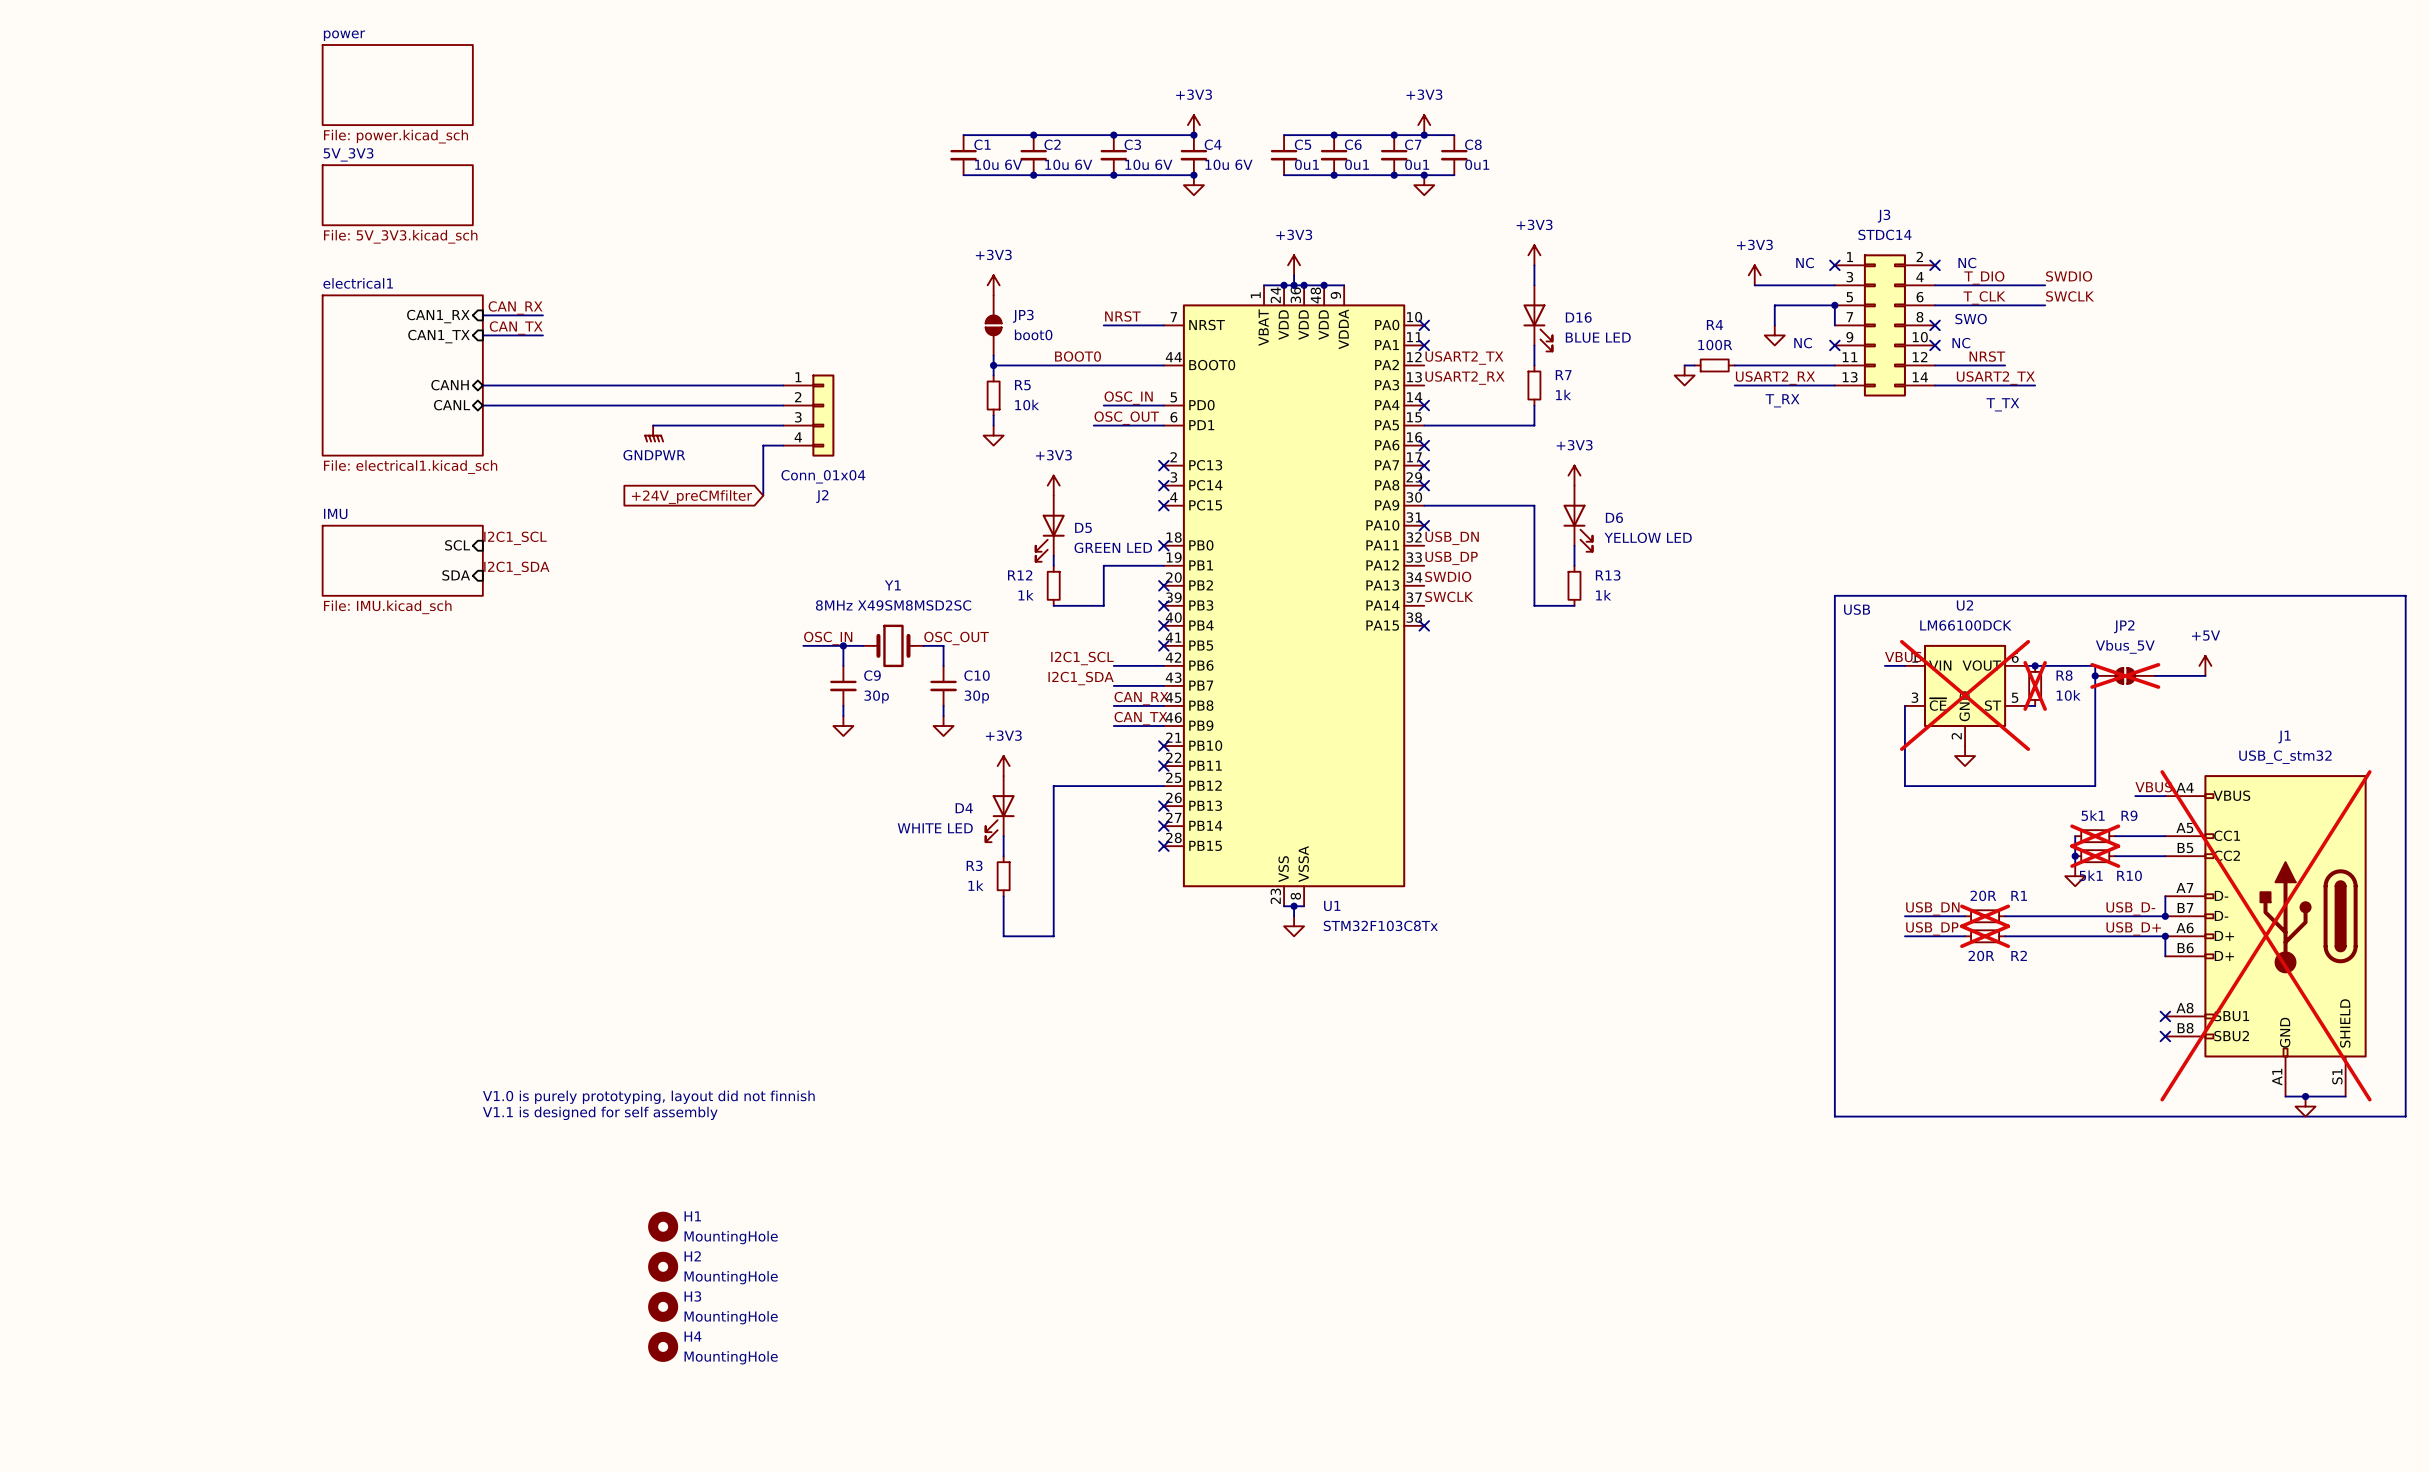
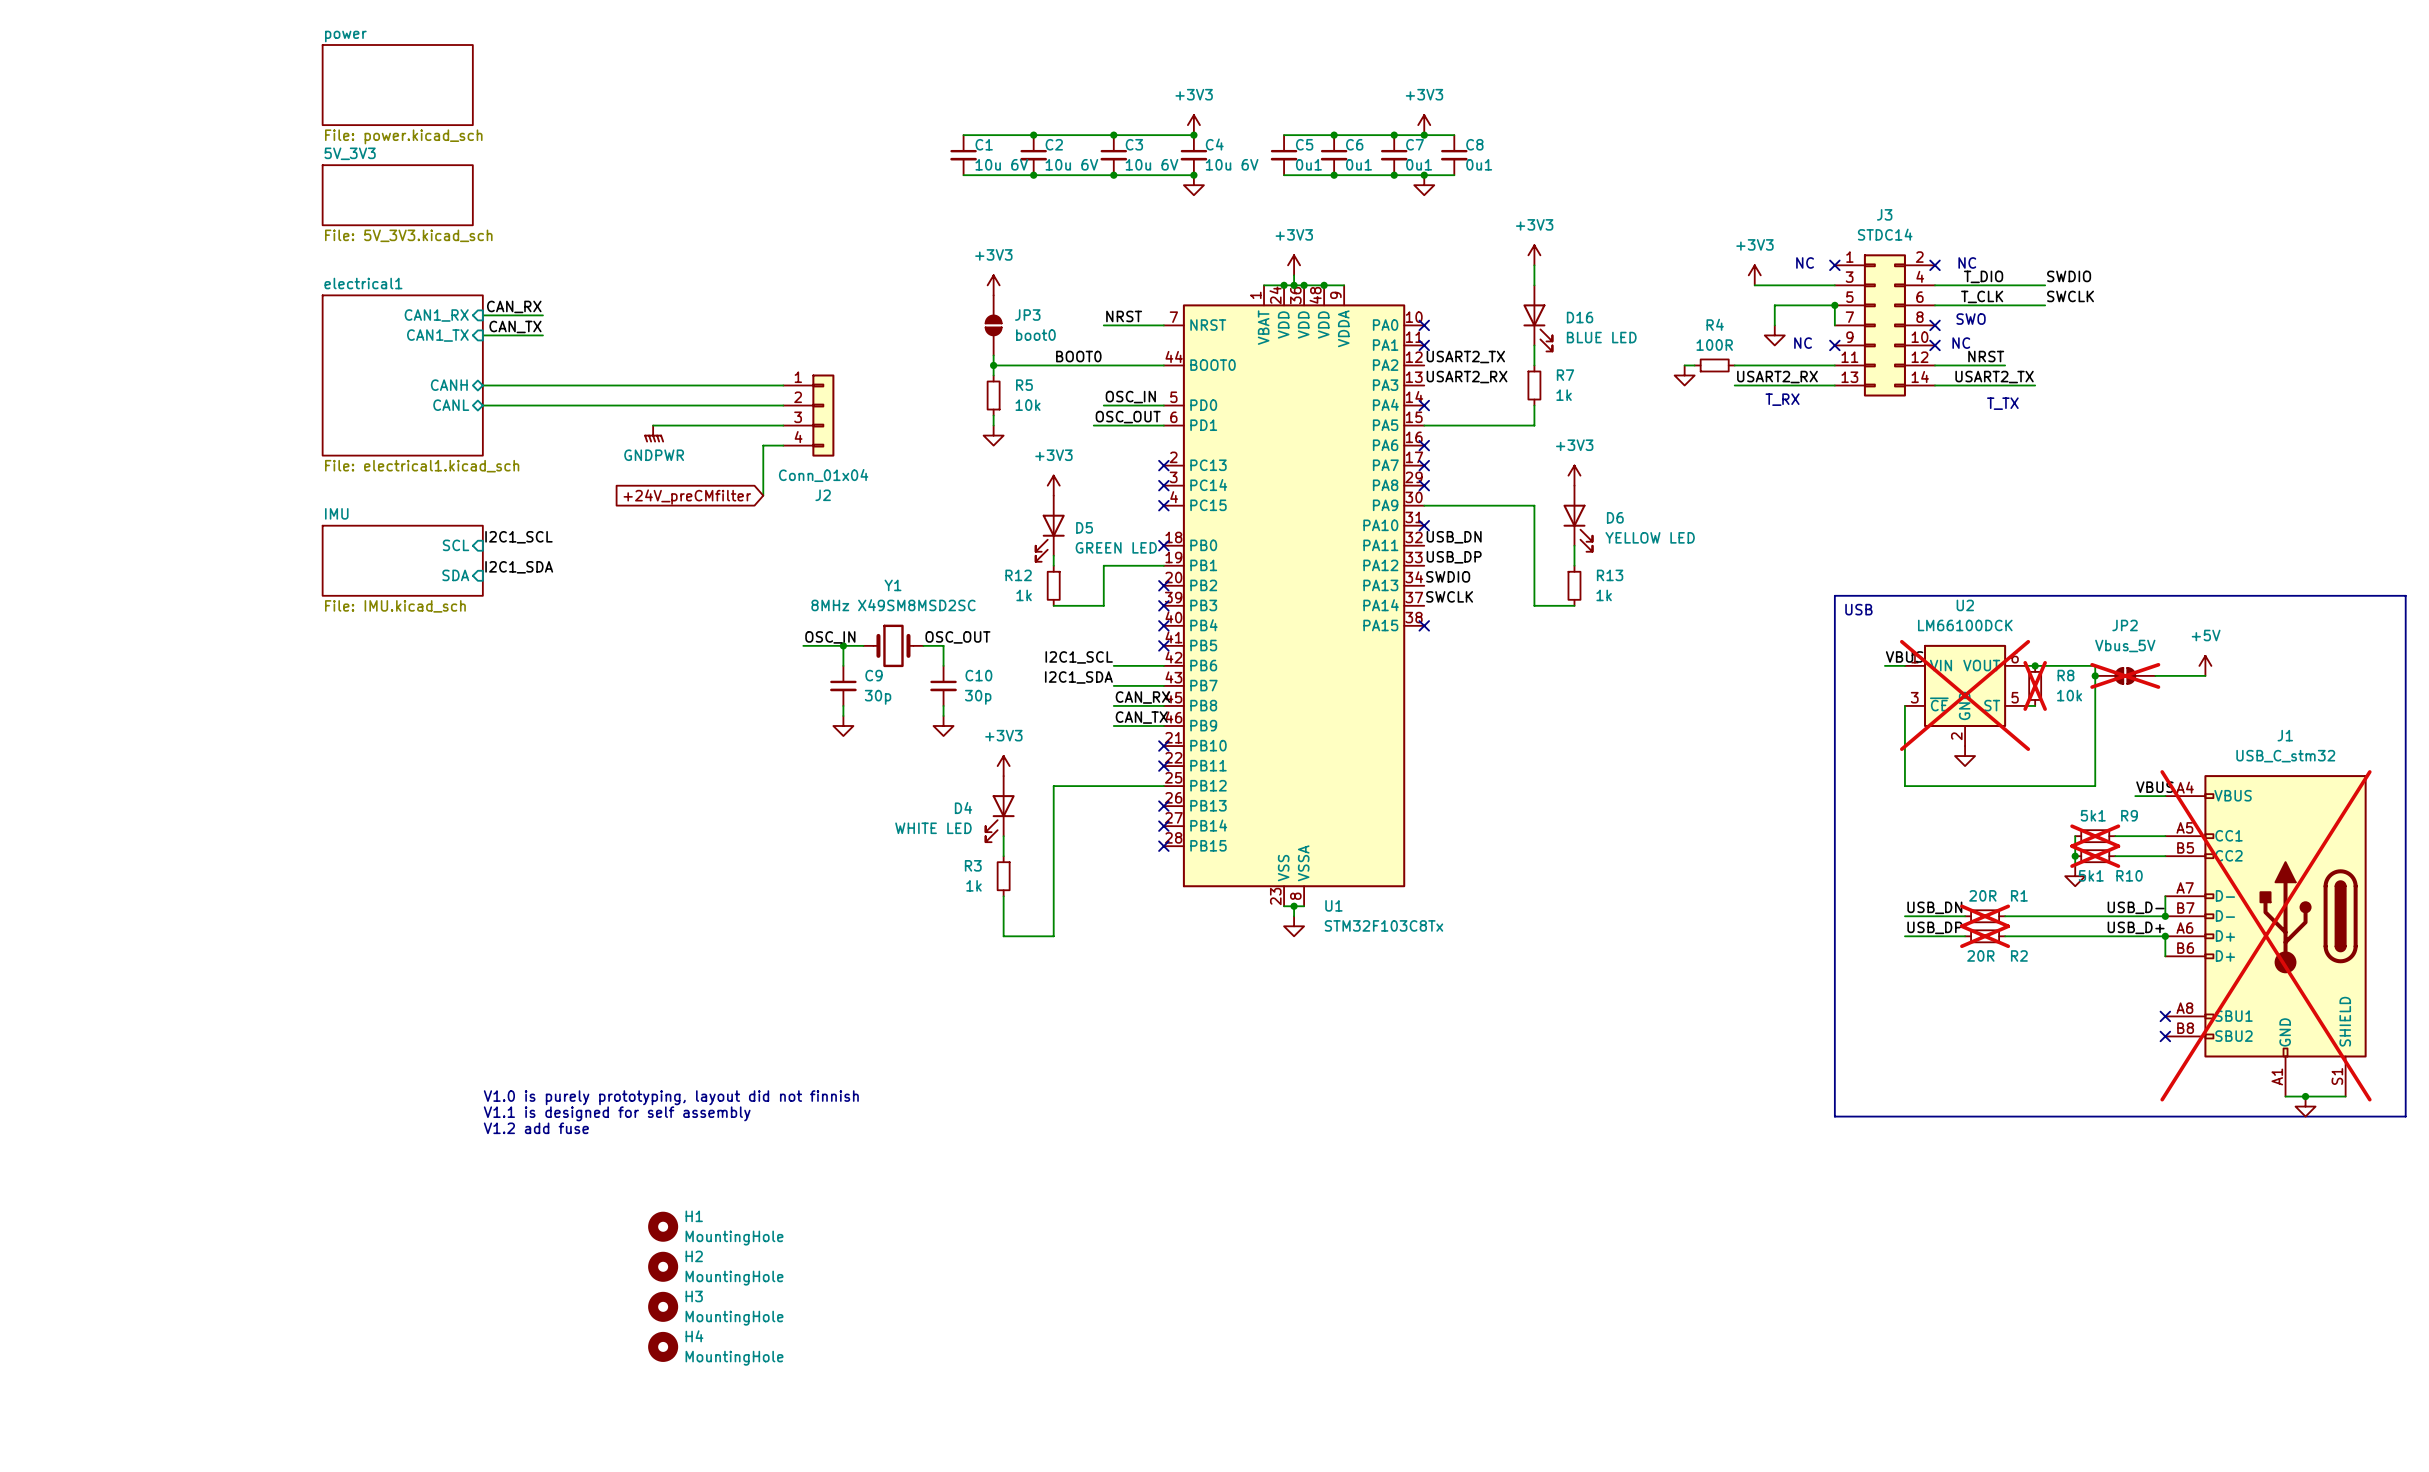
text: none -> V1.2 add fuse (536, 1128)

